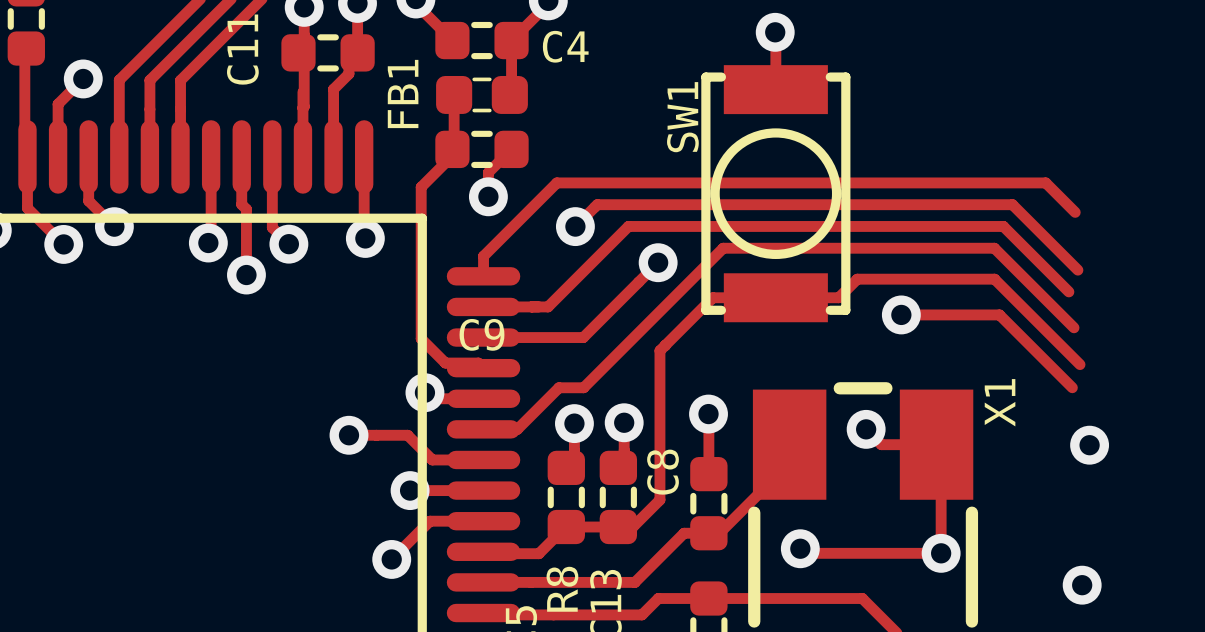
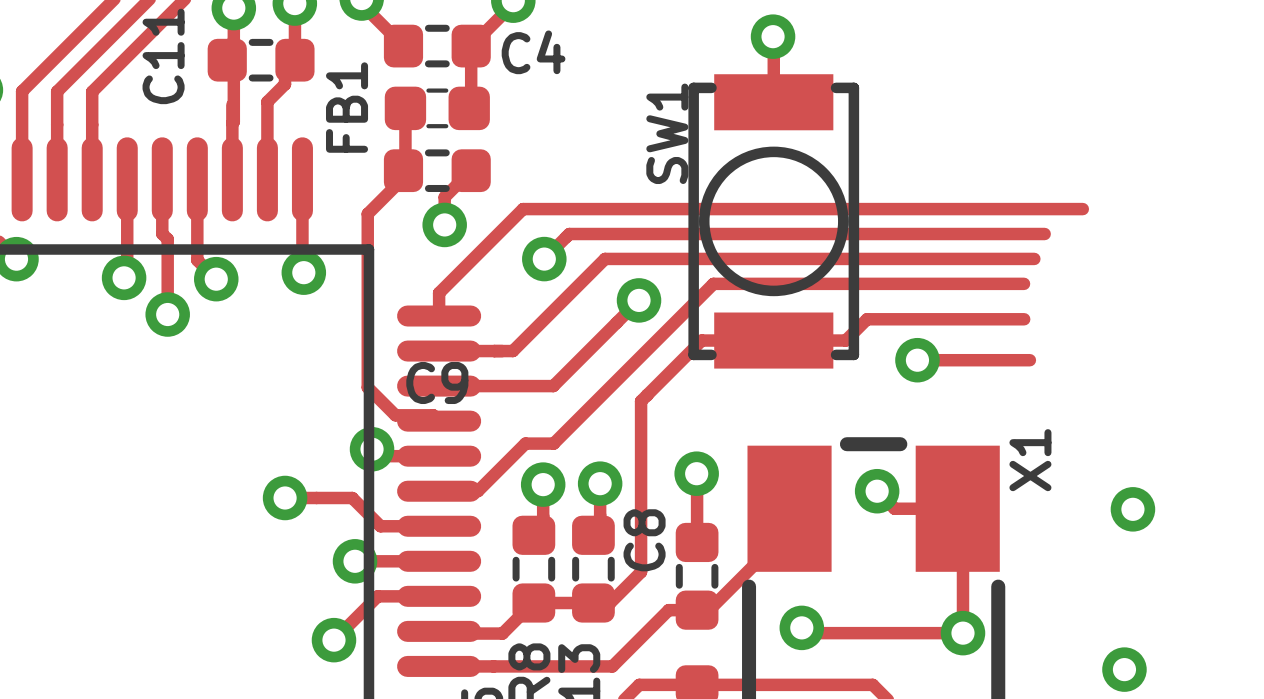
track: (1045, 182) (1075, 212) -> none
track: (1012, 204) (1077, 270) -> none
track: (1003, 226) (1068, 291) -> none
track: (994, 248) (1074, 327) -> none
track: (994, 279) (1080, 364) -> none
track: (999, 314) (1072, 387) -> none

